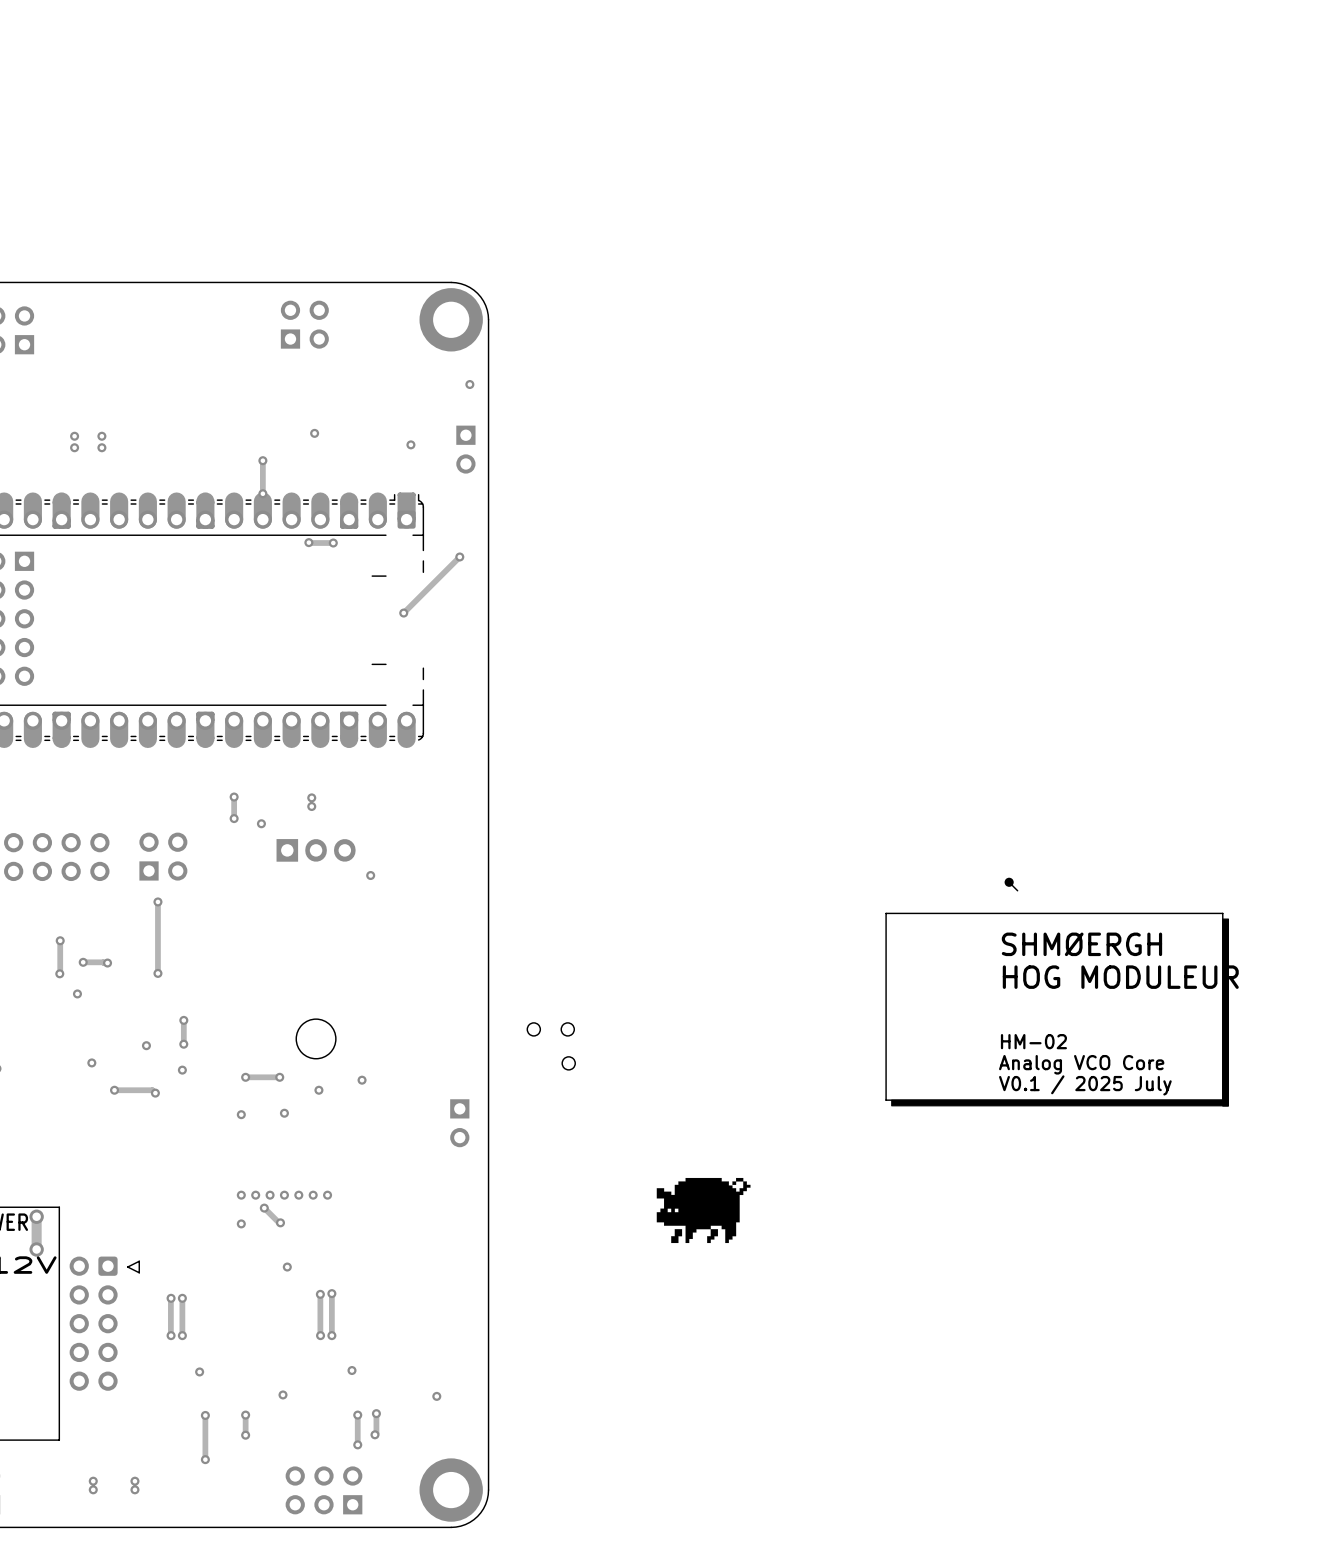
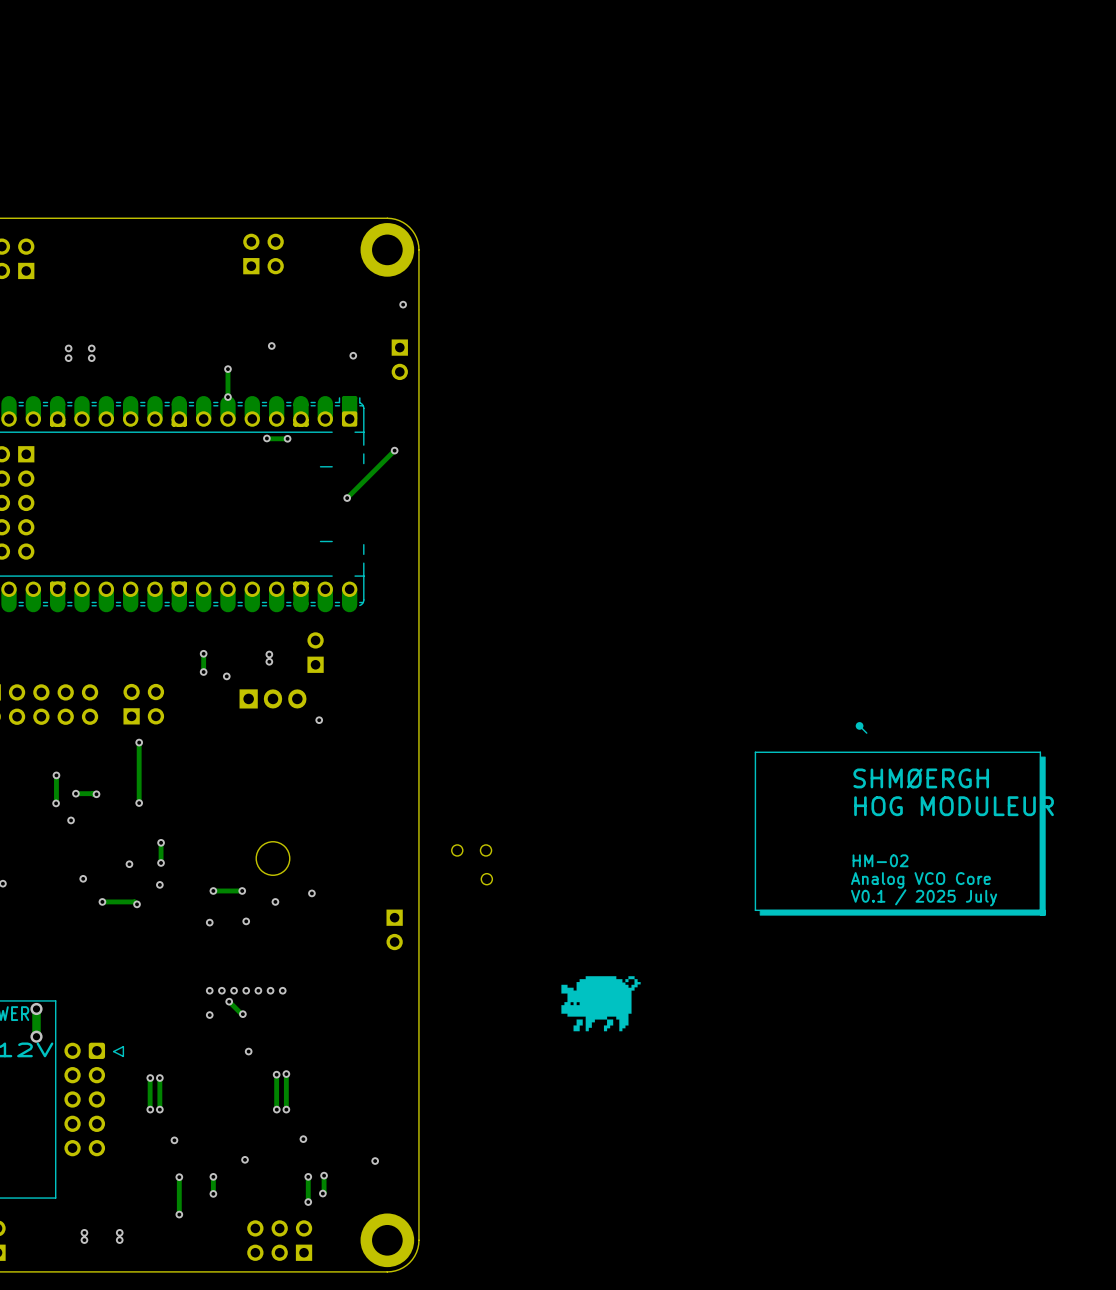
part: none -> (315, 652)

